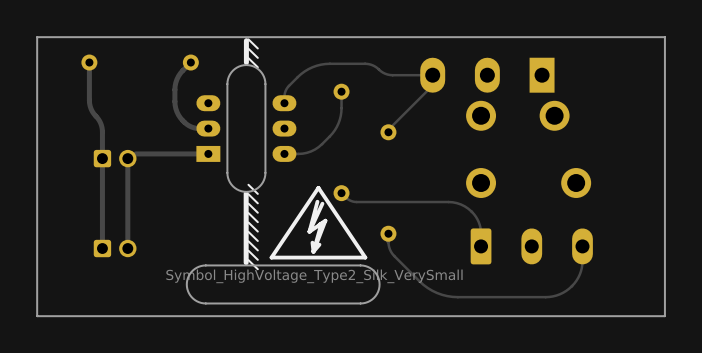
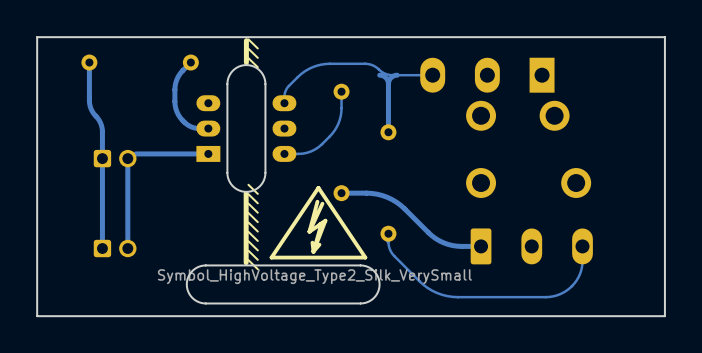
track: none -> (379, 75) (385, 77) (388, 83)
track: none -> (397, 75) (391, 77) (388, 83)
track: (431, 75) (432, 81) (430, 87) (388, 131) -> (388, 83) (388, 131)
track: (341, 193) (349, 200) (354, 201) (448, 202) (460, 204) (471, 211) (477, 219) (480, 230) (481, 246) -> (341, 193) (371, 193) (387, 197) (400, 205) (439, 240) (457, 246) (481, 246)

